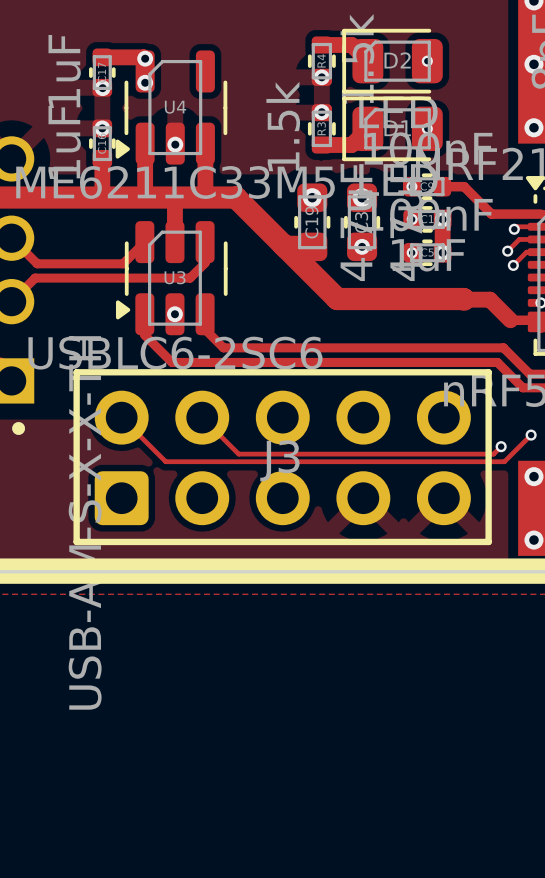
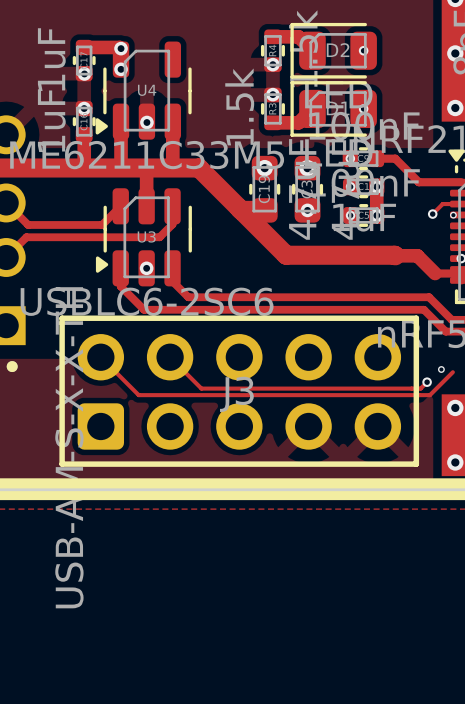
via: (514, 229) -> none
via: none -> (453, 215)
track: (532, 252) (526, 252) (513, 265) -> none
via: (513, 265) -> none
via: none -> (441, 369)
via: (531, 435) -> none

